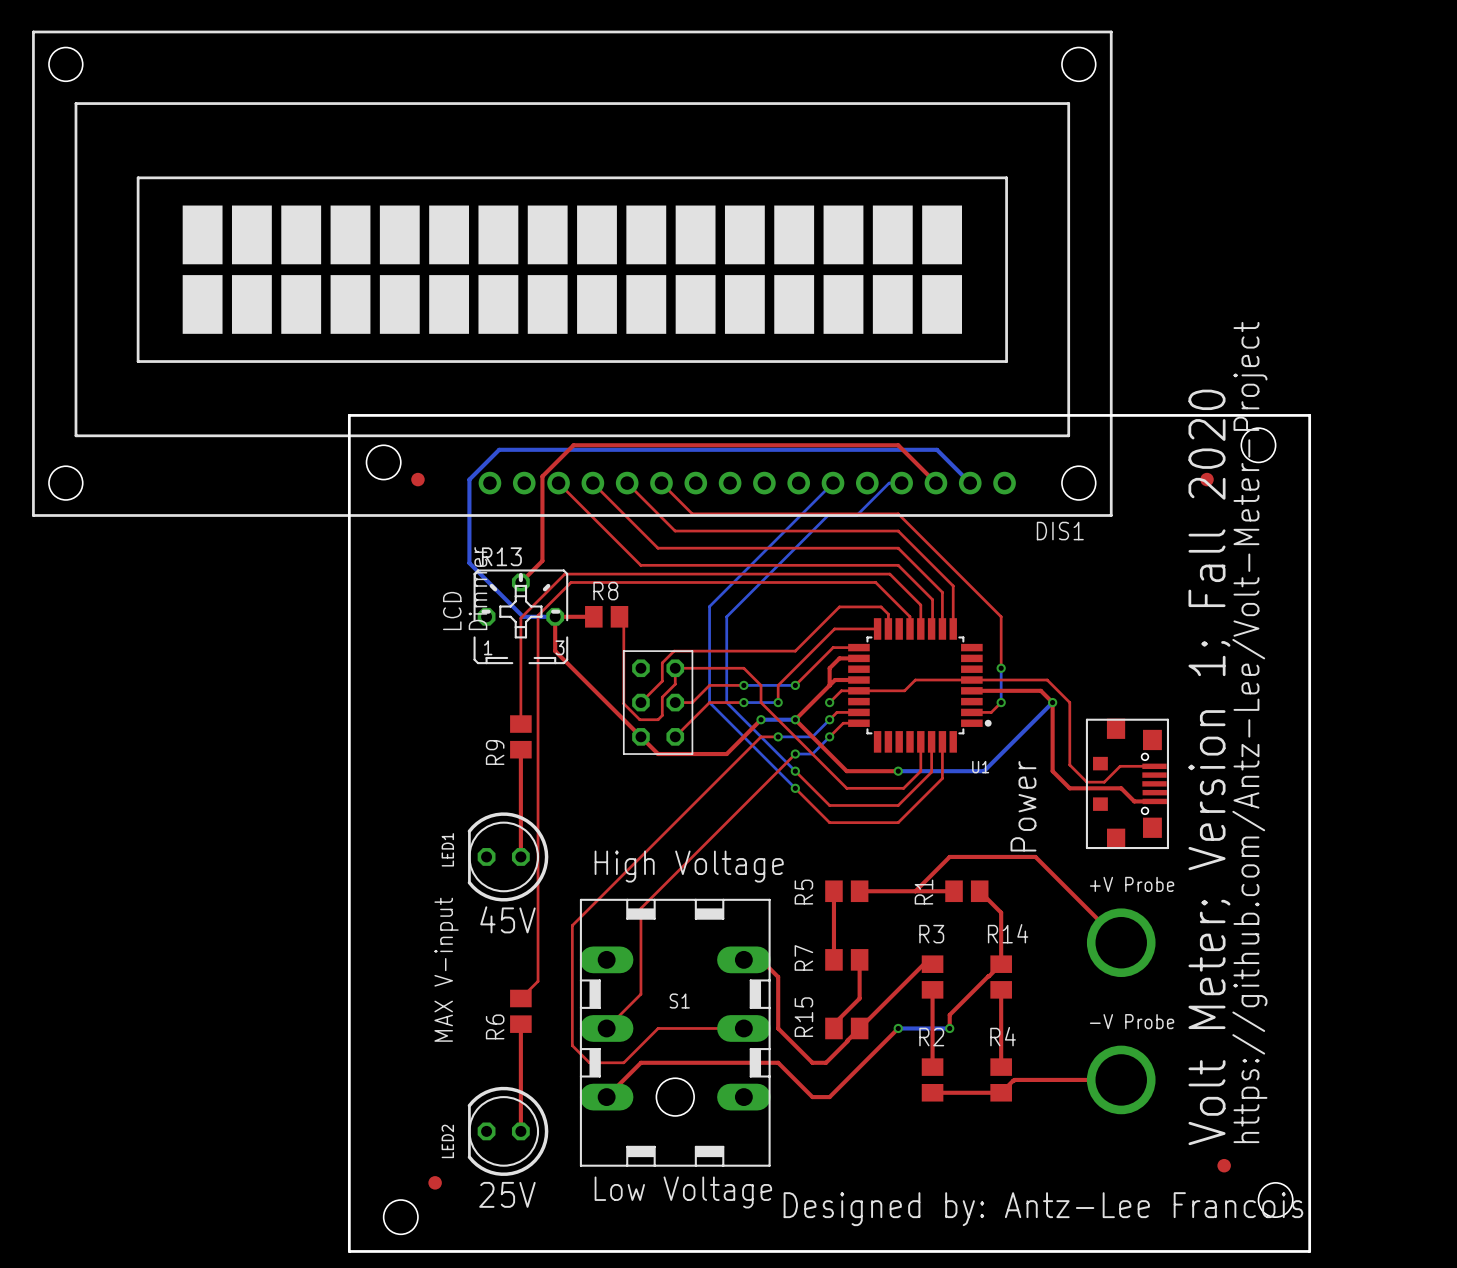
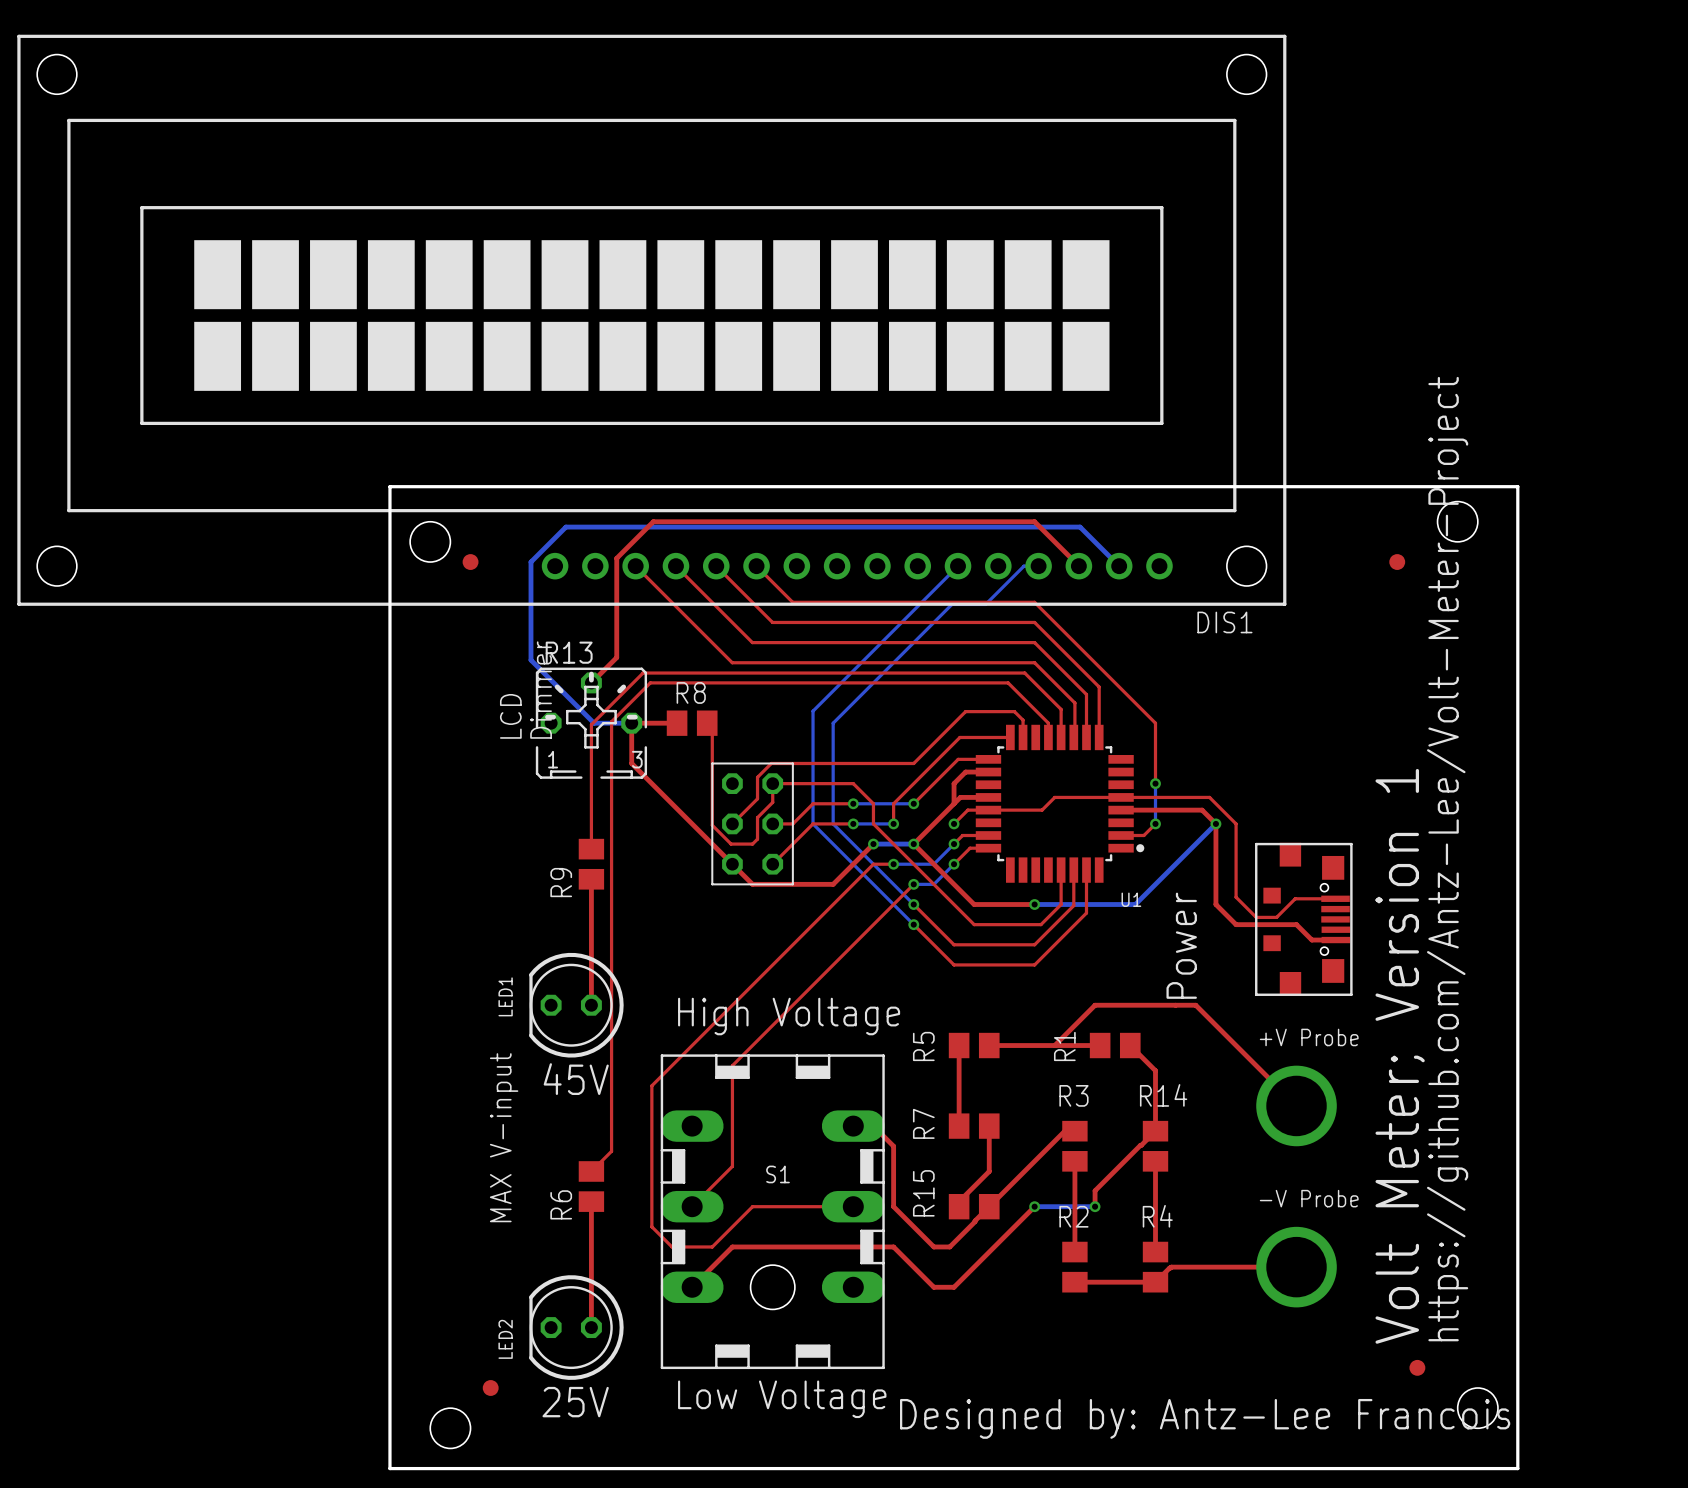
text: Volt Meter; Version 1; Fall 2020 (1209, 767) -> Volt Meter; Version 1 (1400, 1056)

